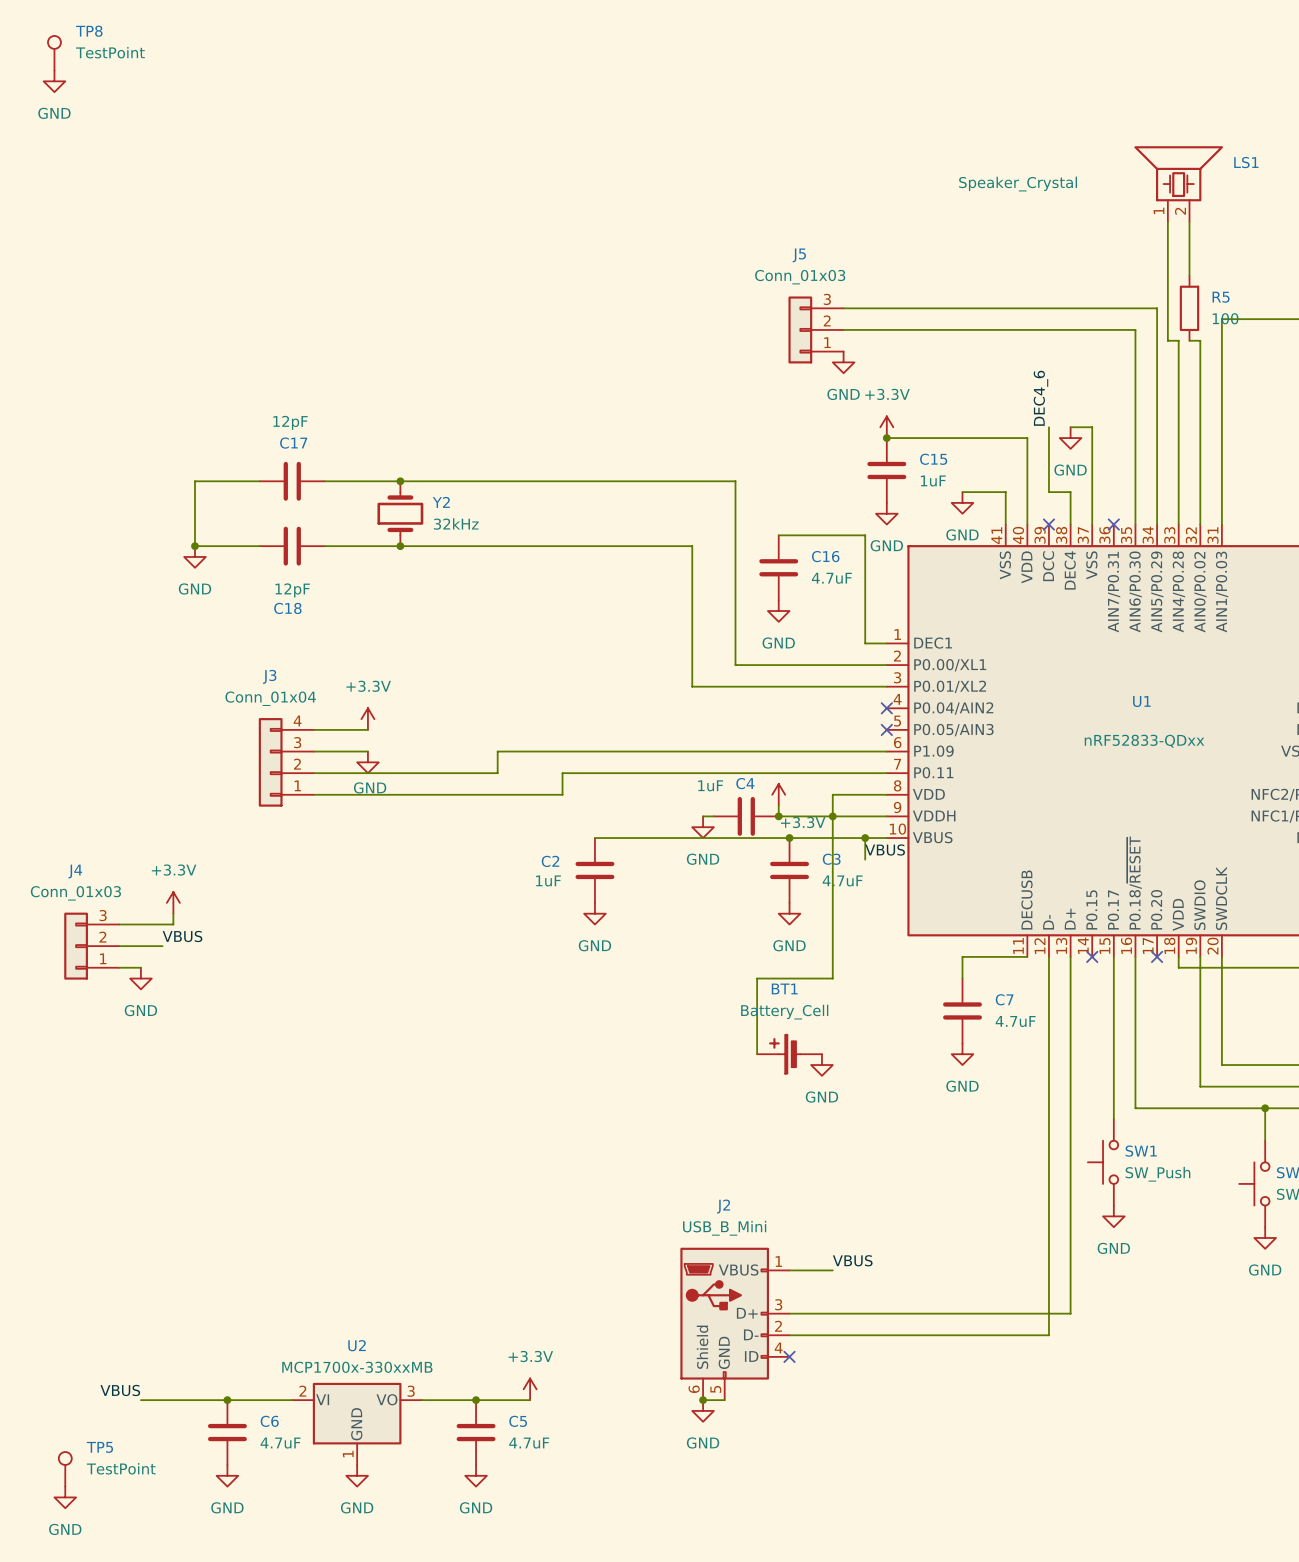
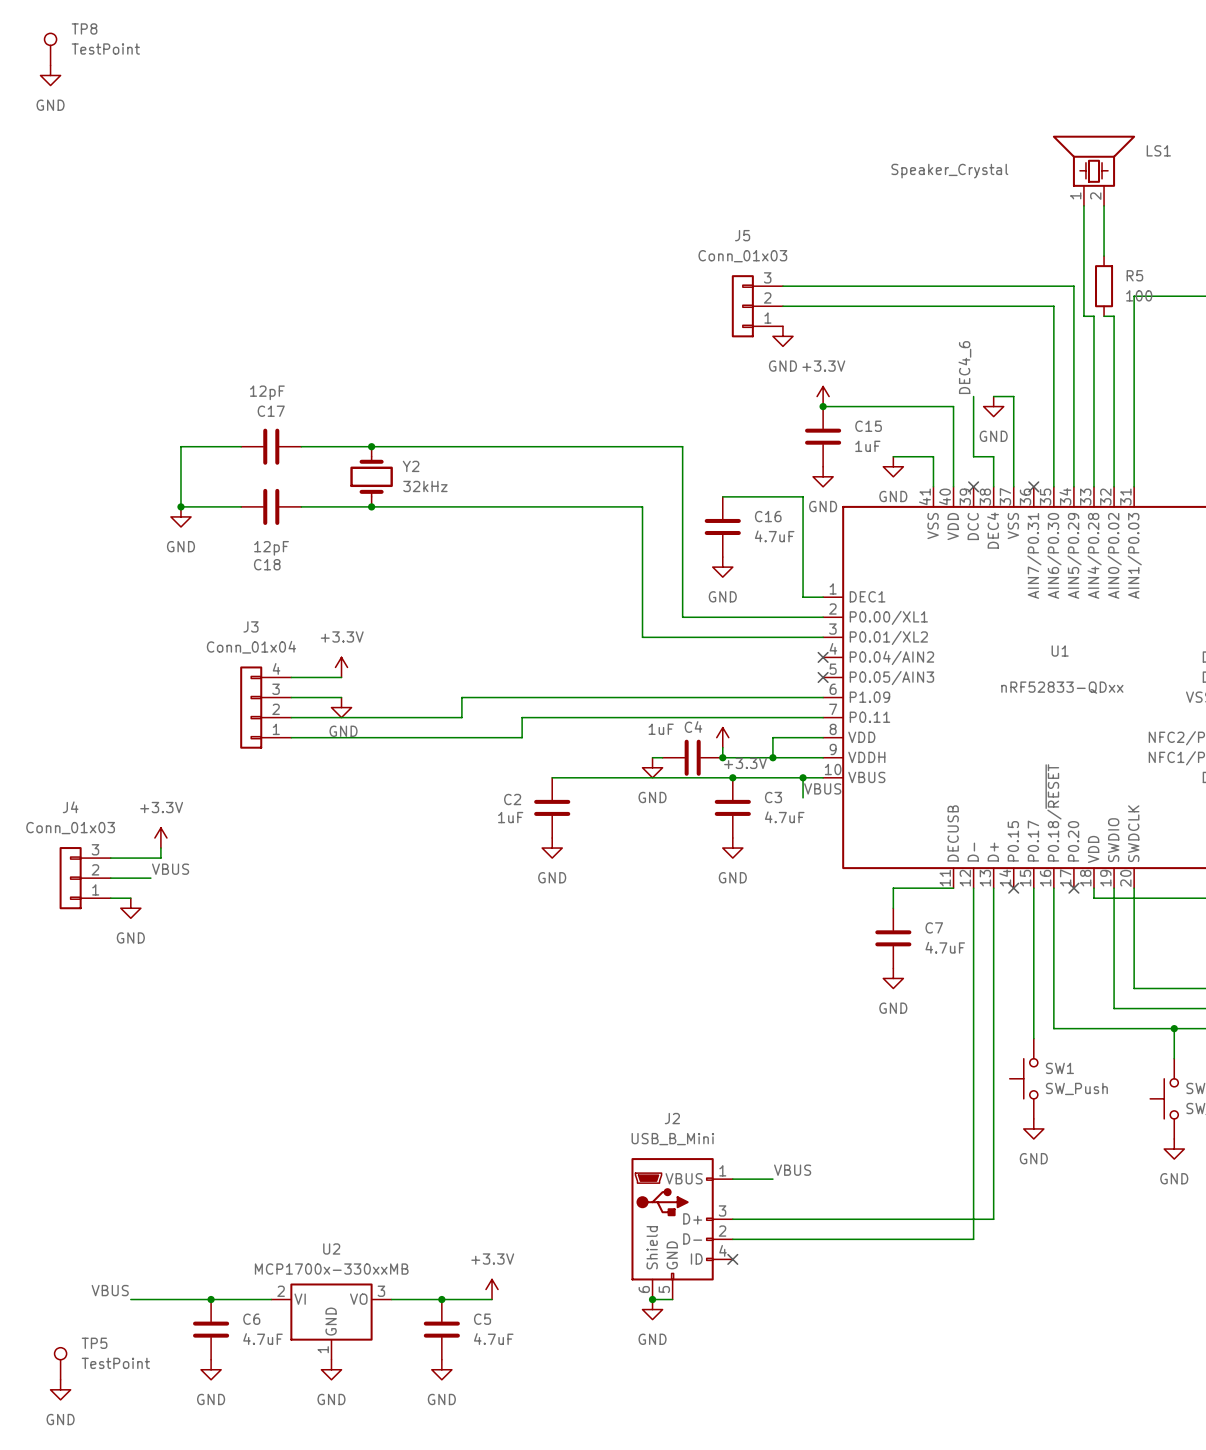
wire: (832, 816) (832, 978) (757, 978) (757, 1054) -> none
BT1: Battery_Cell (789, 1054) -> none
power symbol: GND (821, 1065) -> none

